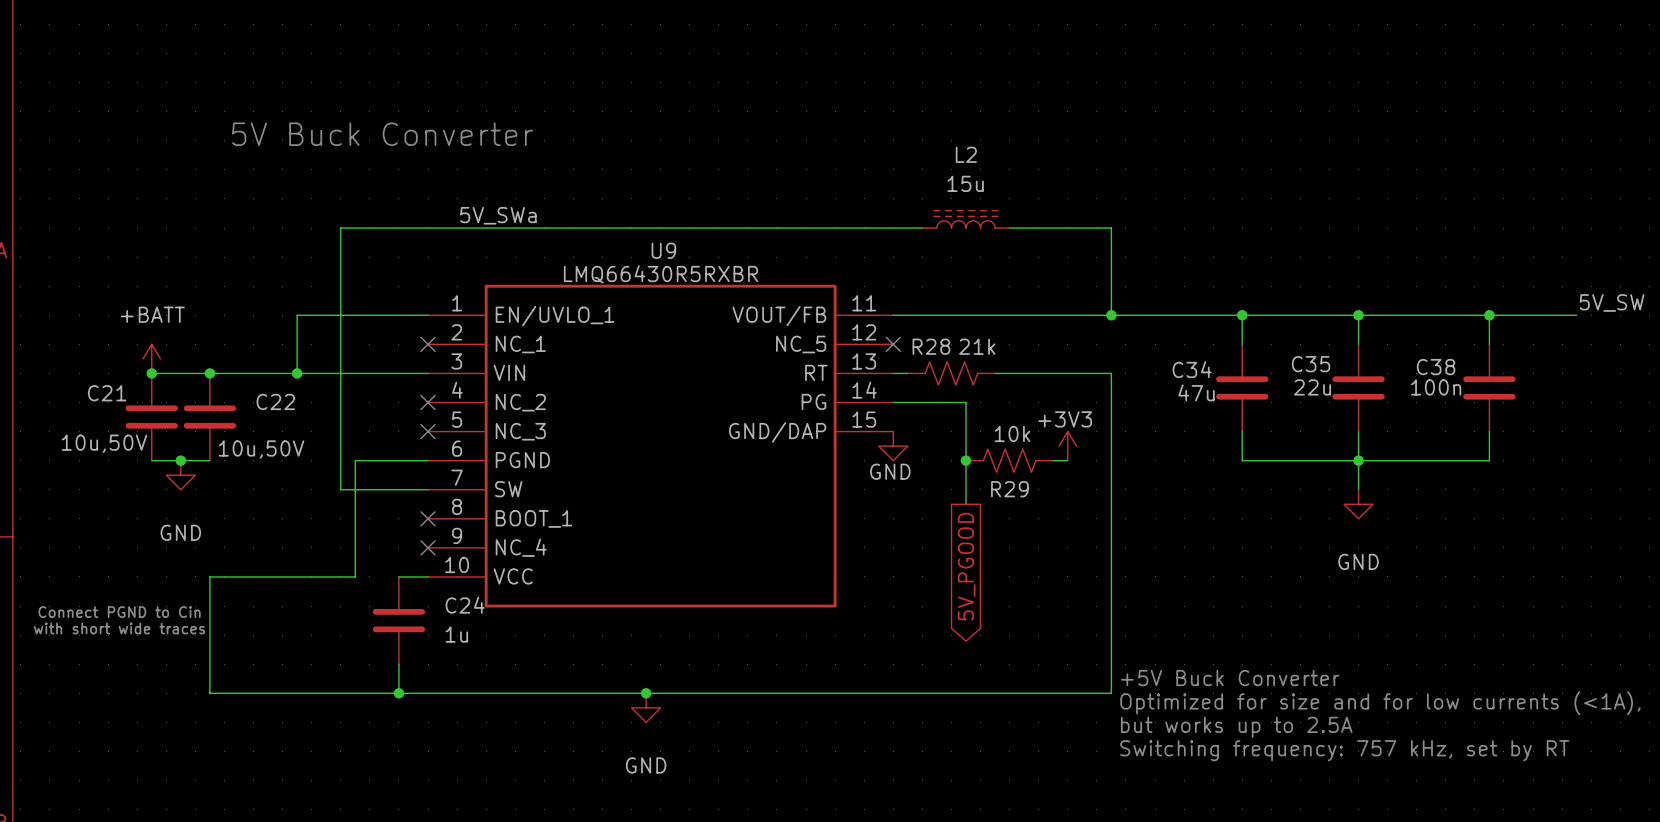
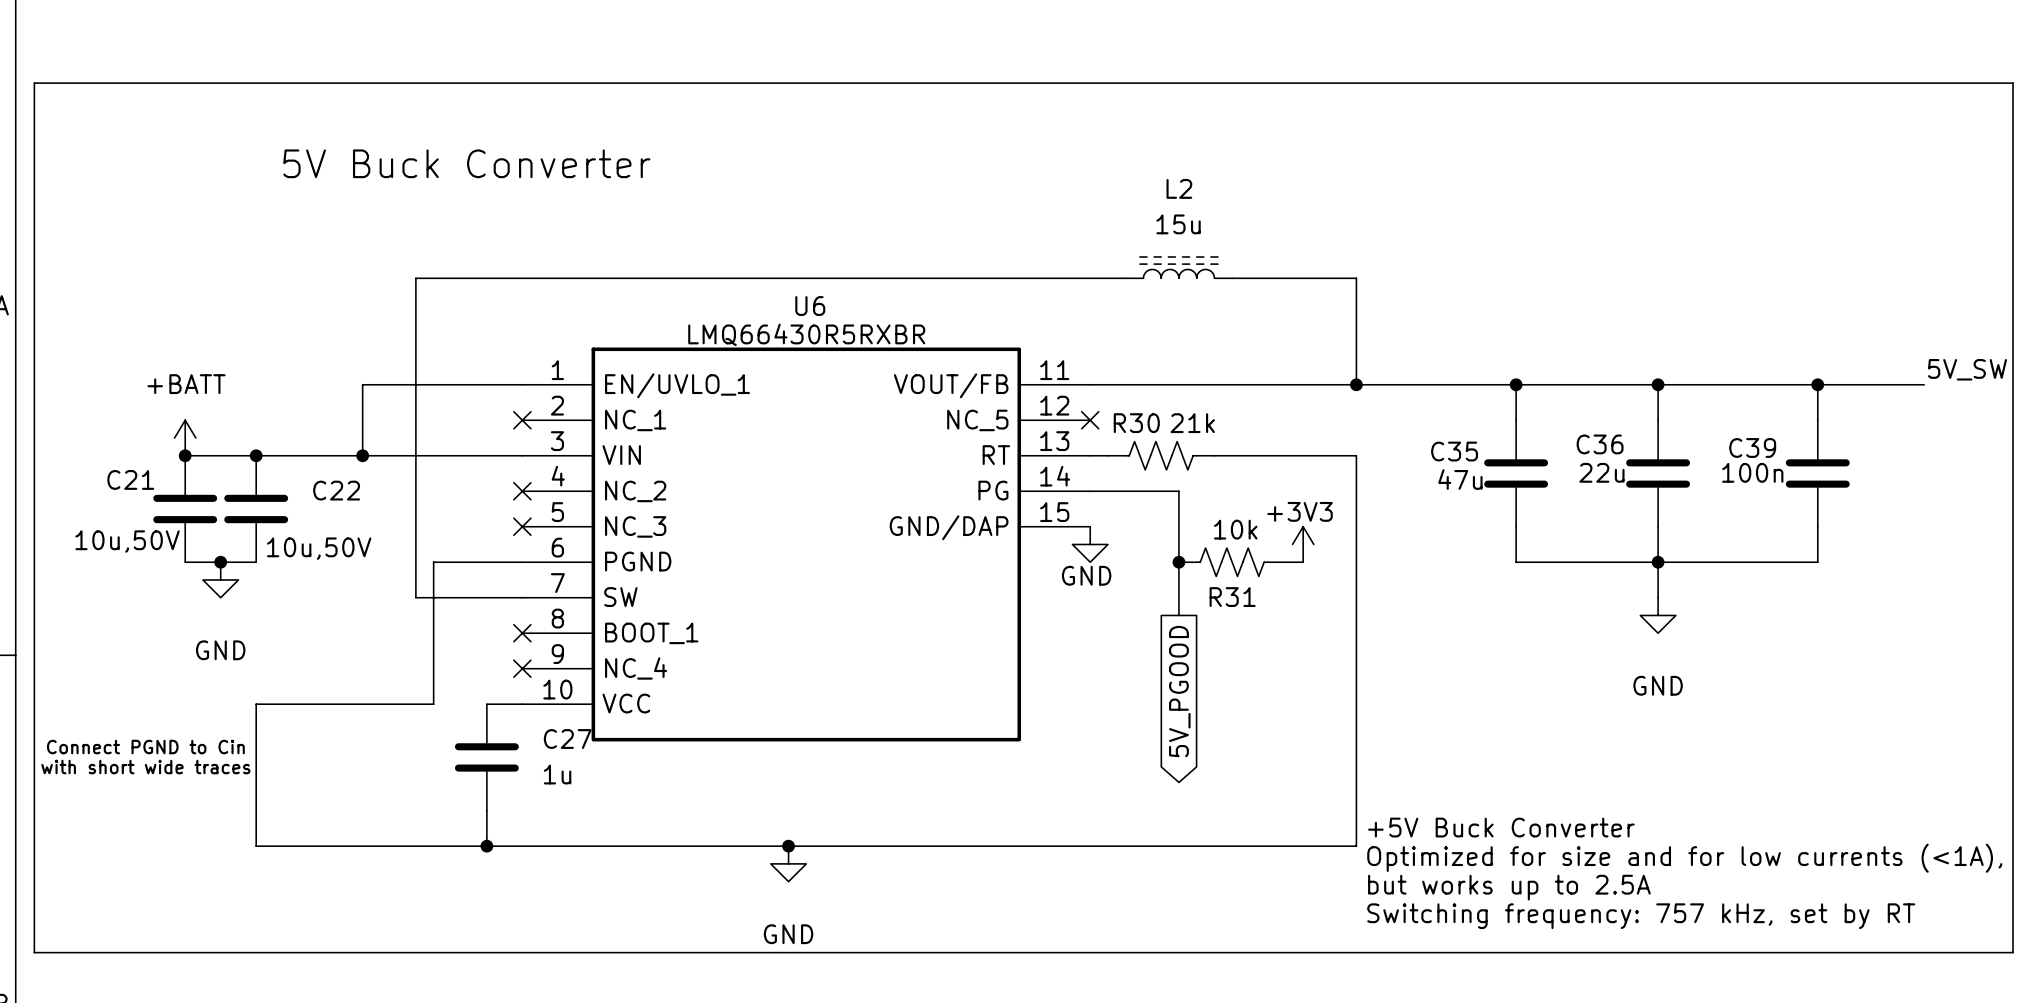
line: none -> (34, 83) (2012, 83) (2012, 952) (34, 952) (34, 83)
label: 5V_SWa (498, 215) -> none
U9 name: U9 (663, 250) -> U6 (810, 306)
R28 name: R28 (931, 346) -> R30 (1136, 423)
C35 name: C35 (1311, 364) -> C36 (1600, 444)
C38 name: C38 (1436, 367) -> C39 (1752, 447)
C34 name: C34 (1192, 369) -> C35 (1454, 451)
R29 name: R29 (1009, 489) -> R31 (1232, 597)
C24 name: C24 (465, 605) -> C27 (567, 739)

